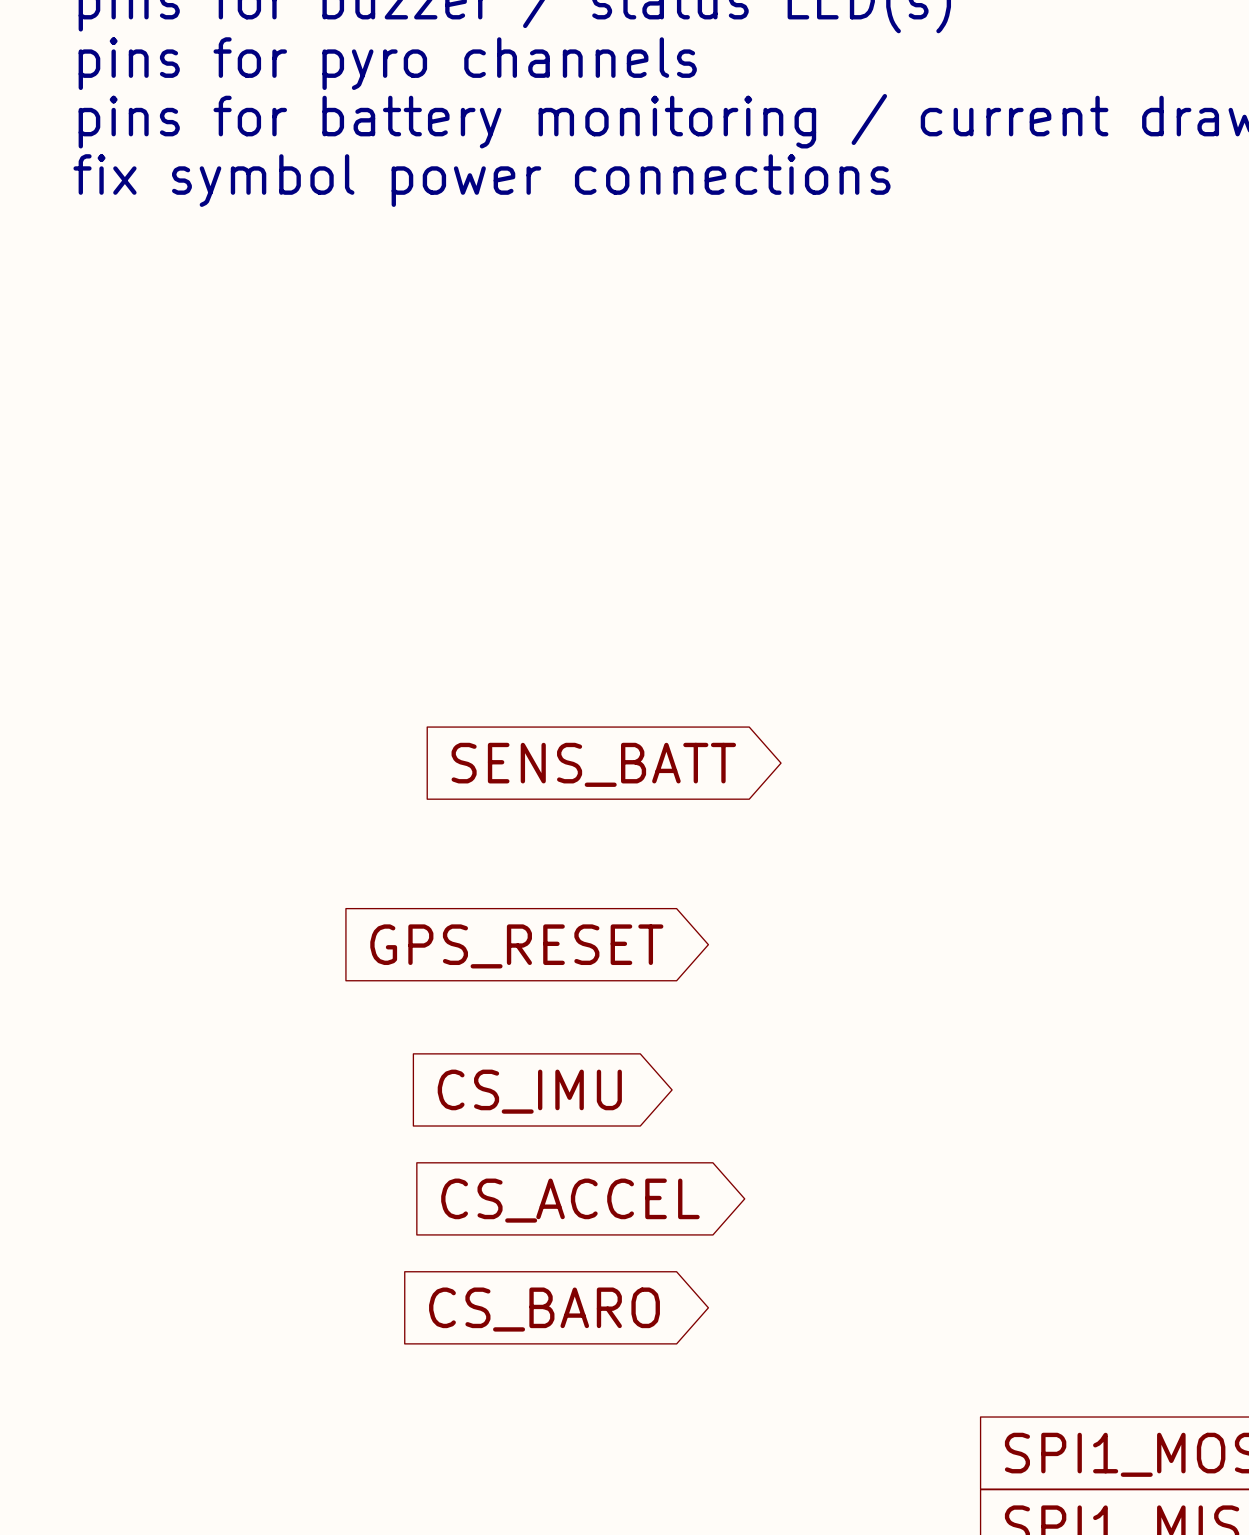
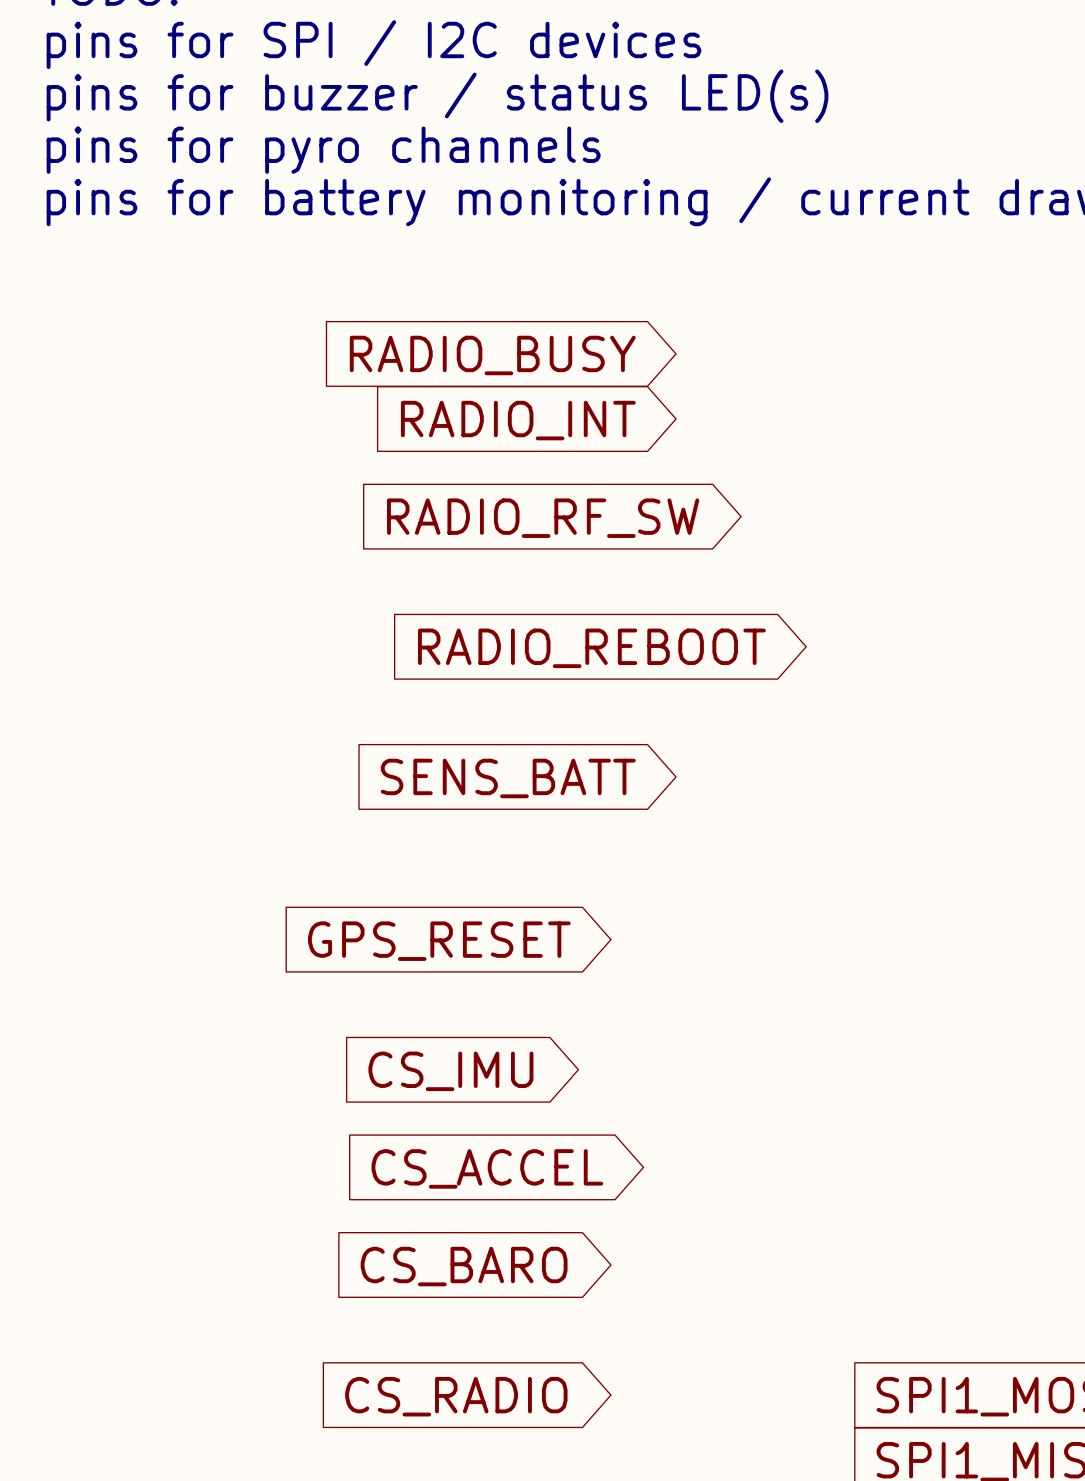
text: fix symbol power connections (481, 180) -> none
global label: none -> RADIO_BUSY (492, 355)
global label: none -> RADIO_INT (518, 420)
global label: none -> RADIO_RF_SW (543, 518)
global label: none -> RADIO_REBOOT (591, 648)
global label: none -> CS_RADIO (456, 1396)

